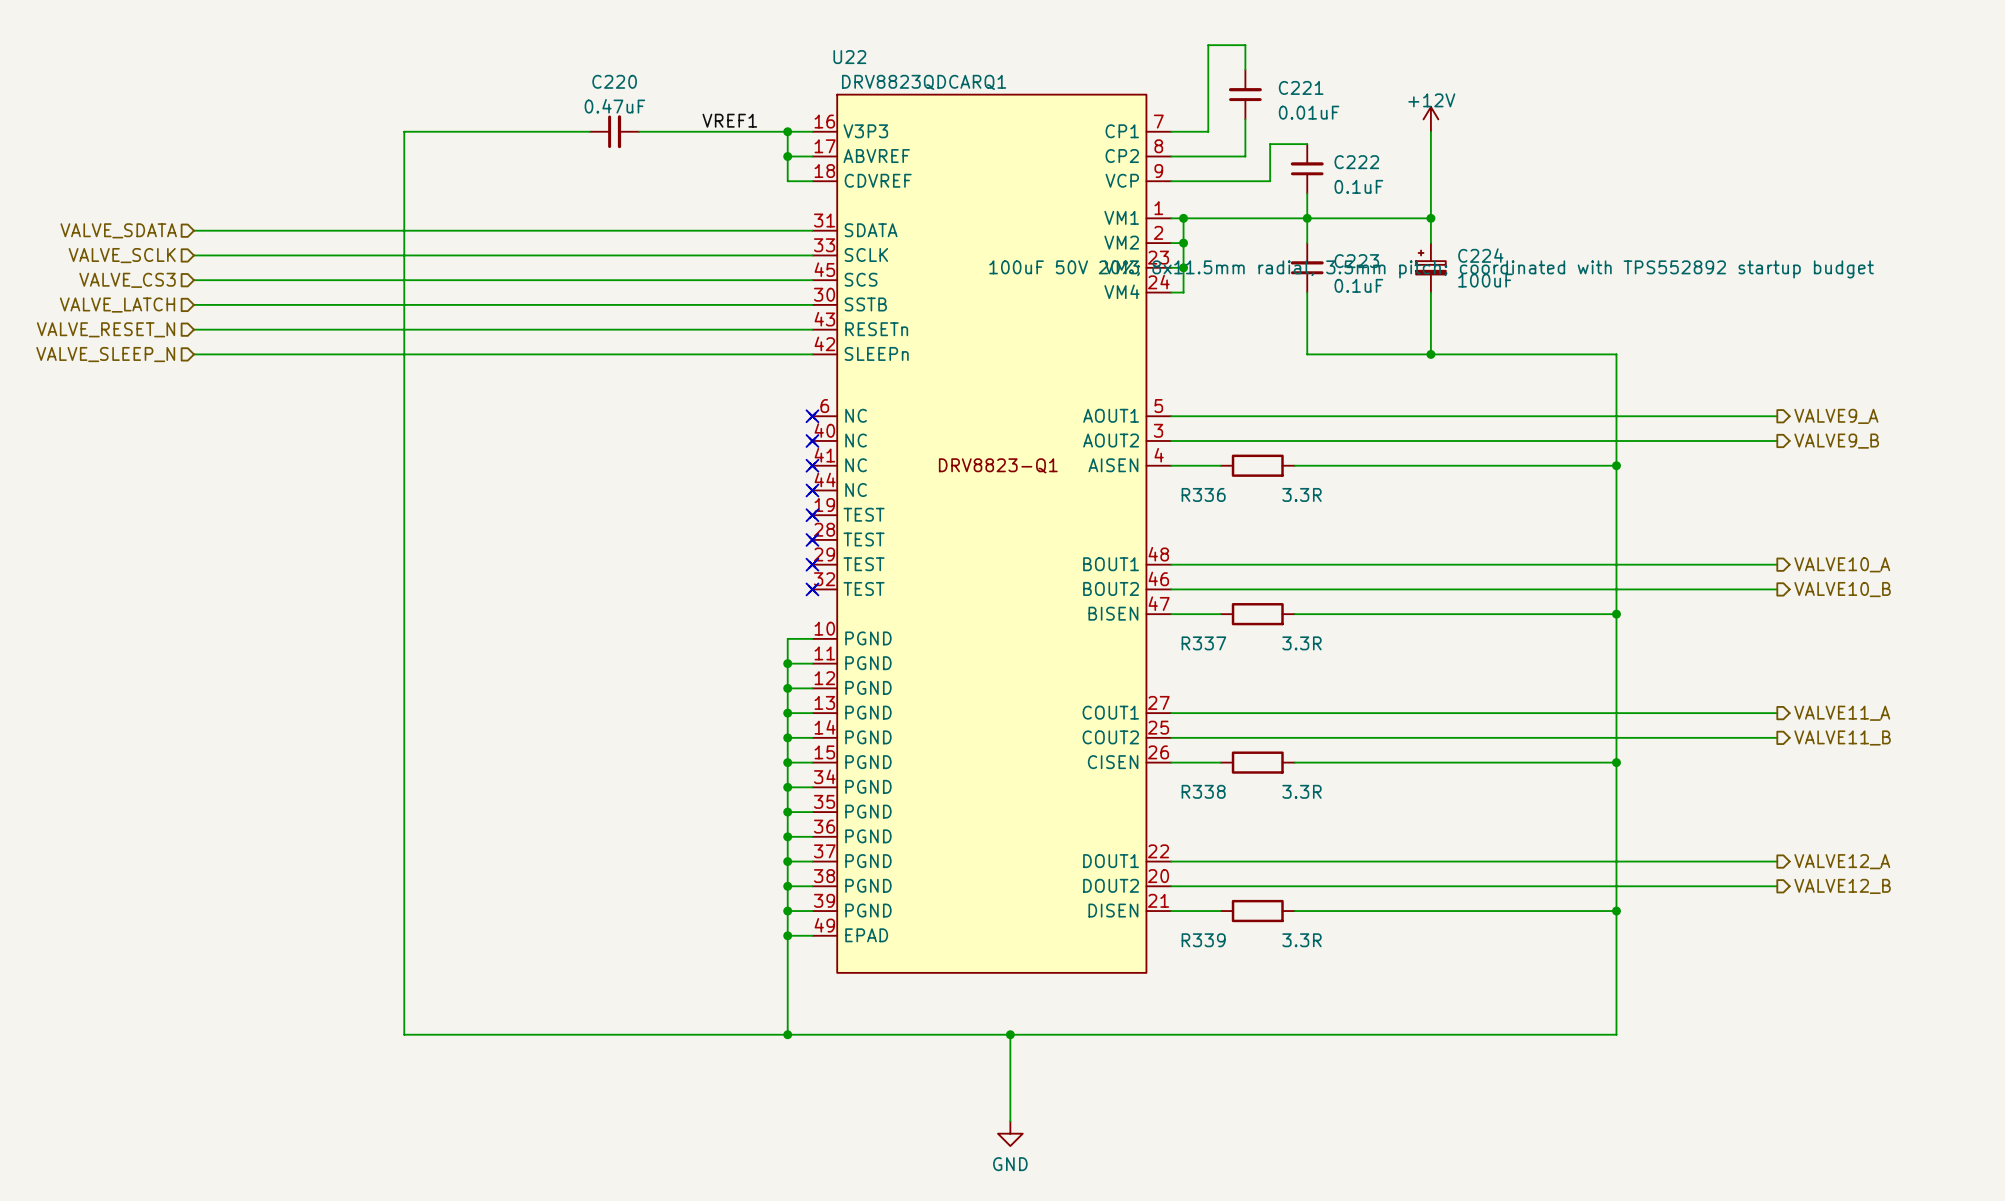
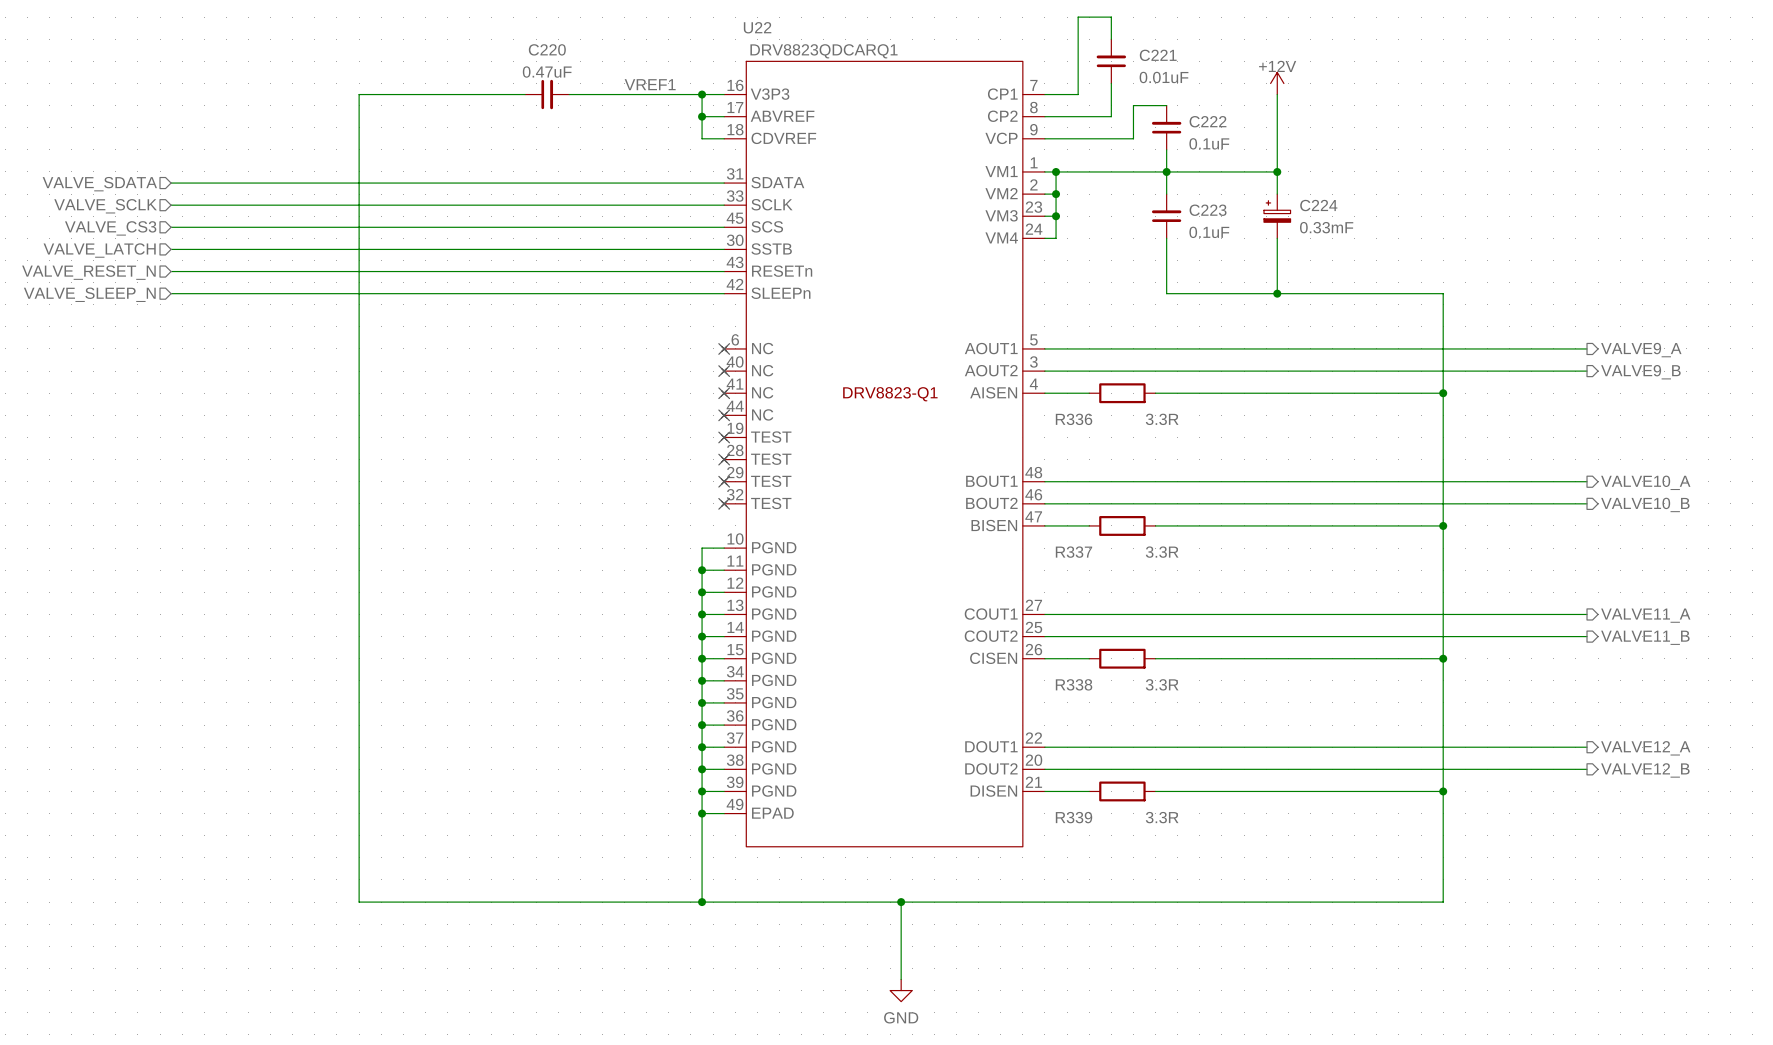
C224 text: 100uF 50V 20%; 8x11.5mm radial, 3.5mm pitch; coordinated with TPS552892 startup budget (1431, 269) -> none
C224 value: 100uF (1485, 280) -> 0.33mF (1326, 227)

